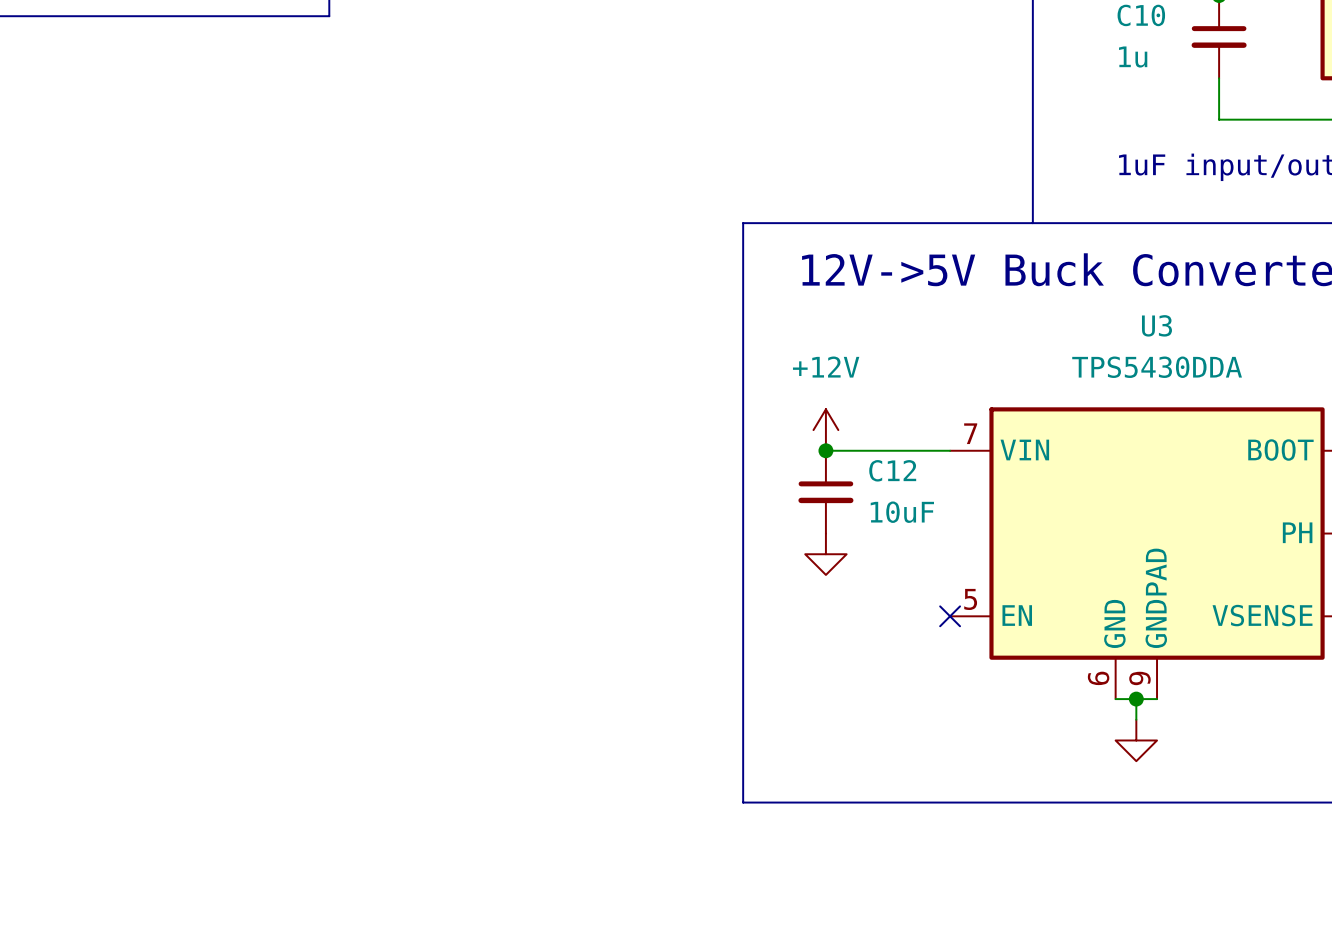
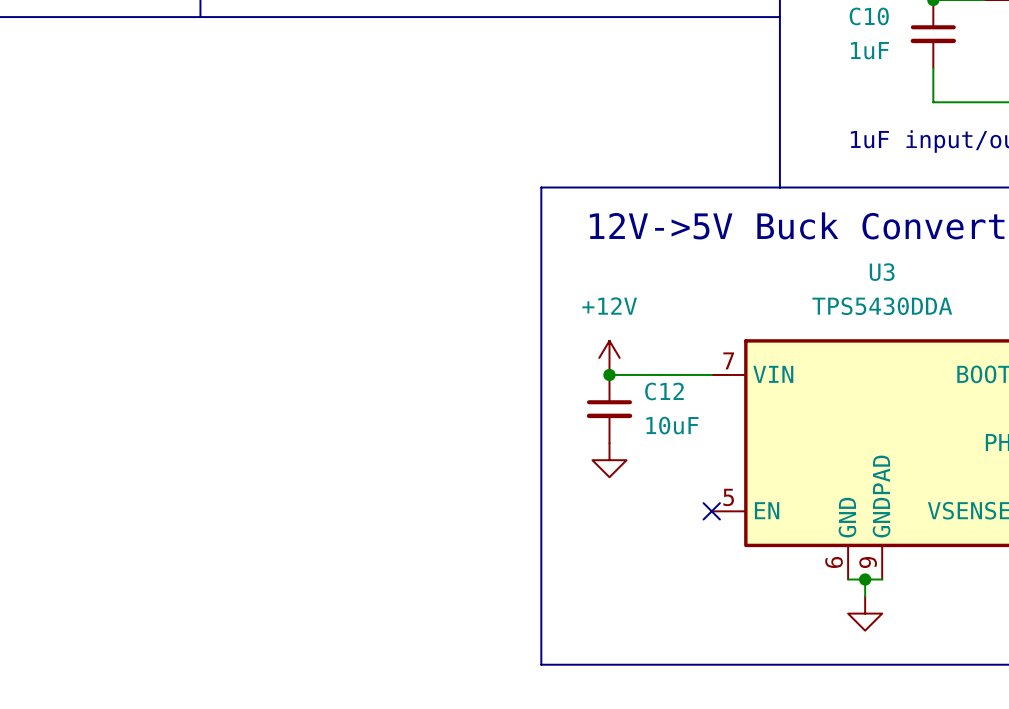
line: none -> (200, 17) (779, 17)
C10 value: 1u (1133, 57) -> 1uF (869, 50)

